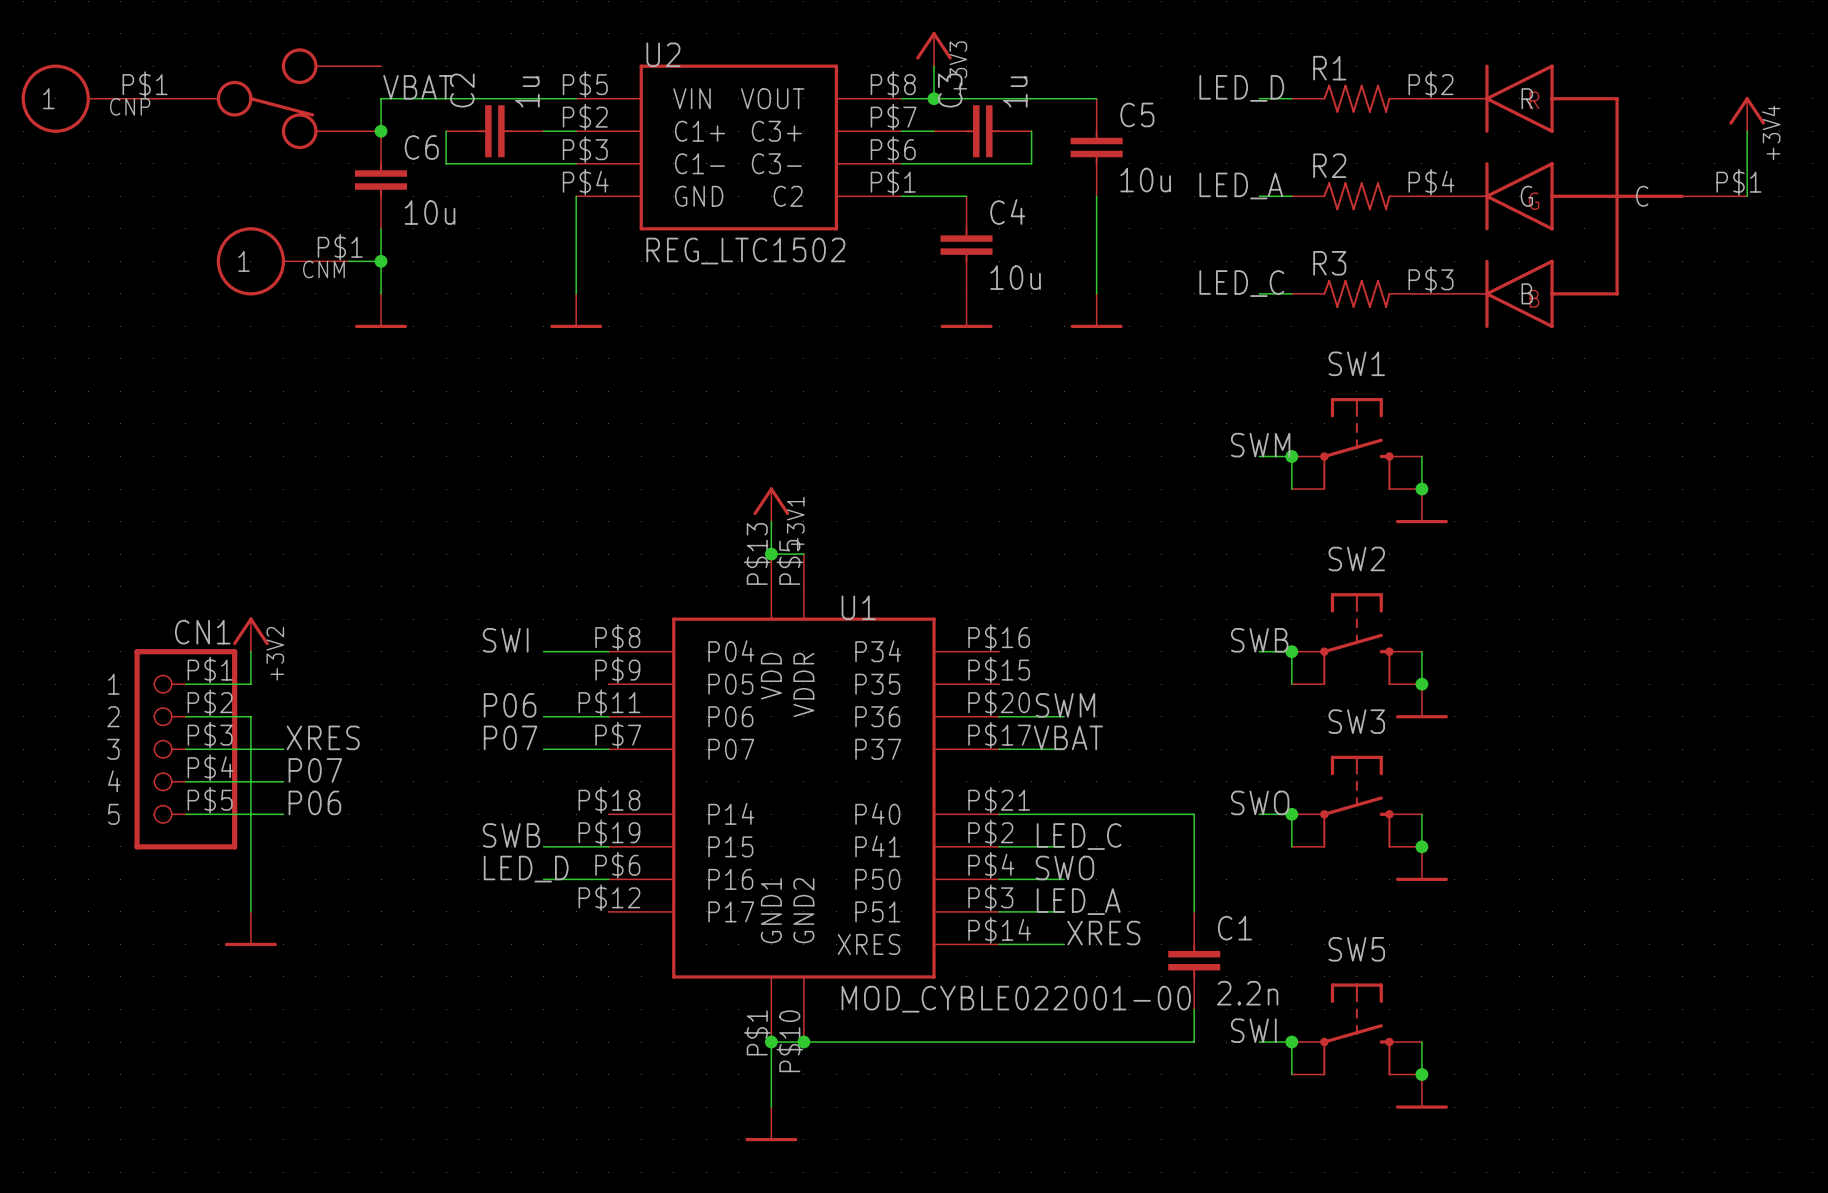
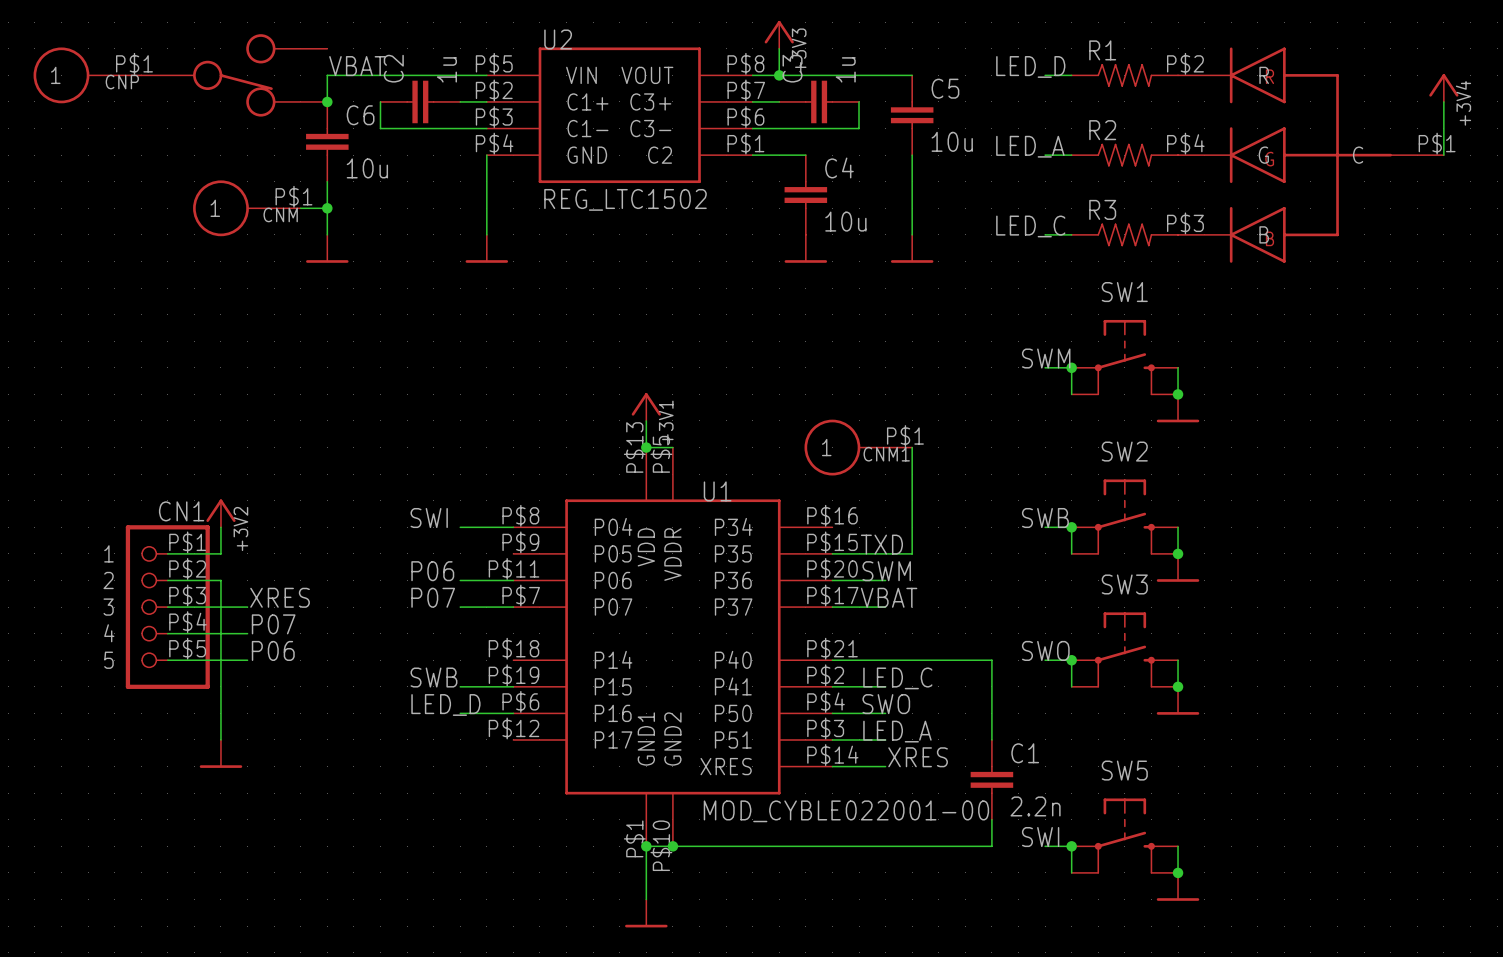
CNM1: none -> (858, 447)
wire: none -> (912, 447) (912, 553) (832, 553)
label: none -> TXD (881, 544)

